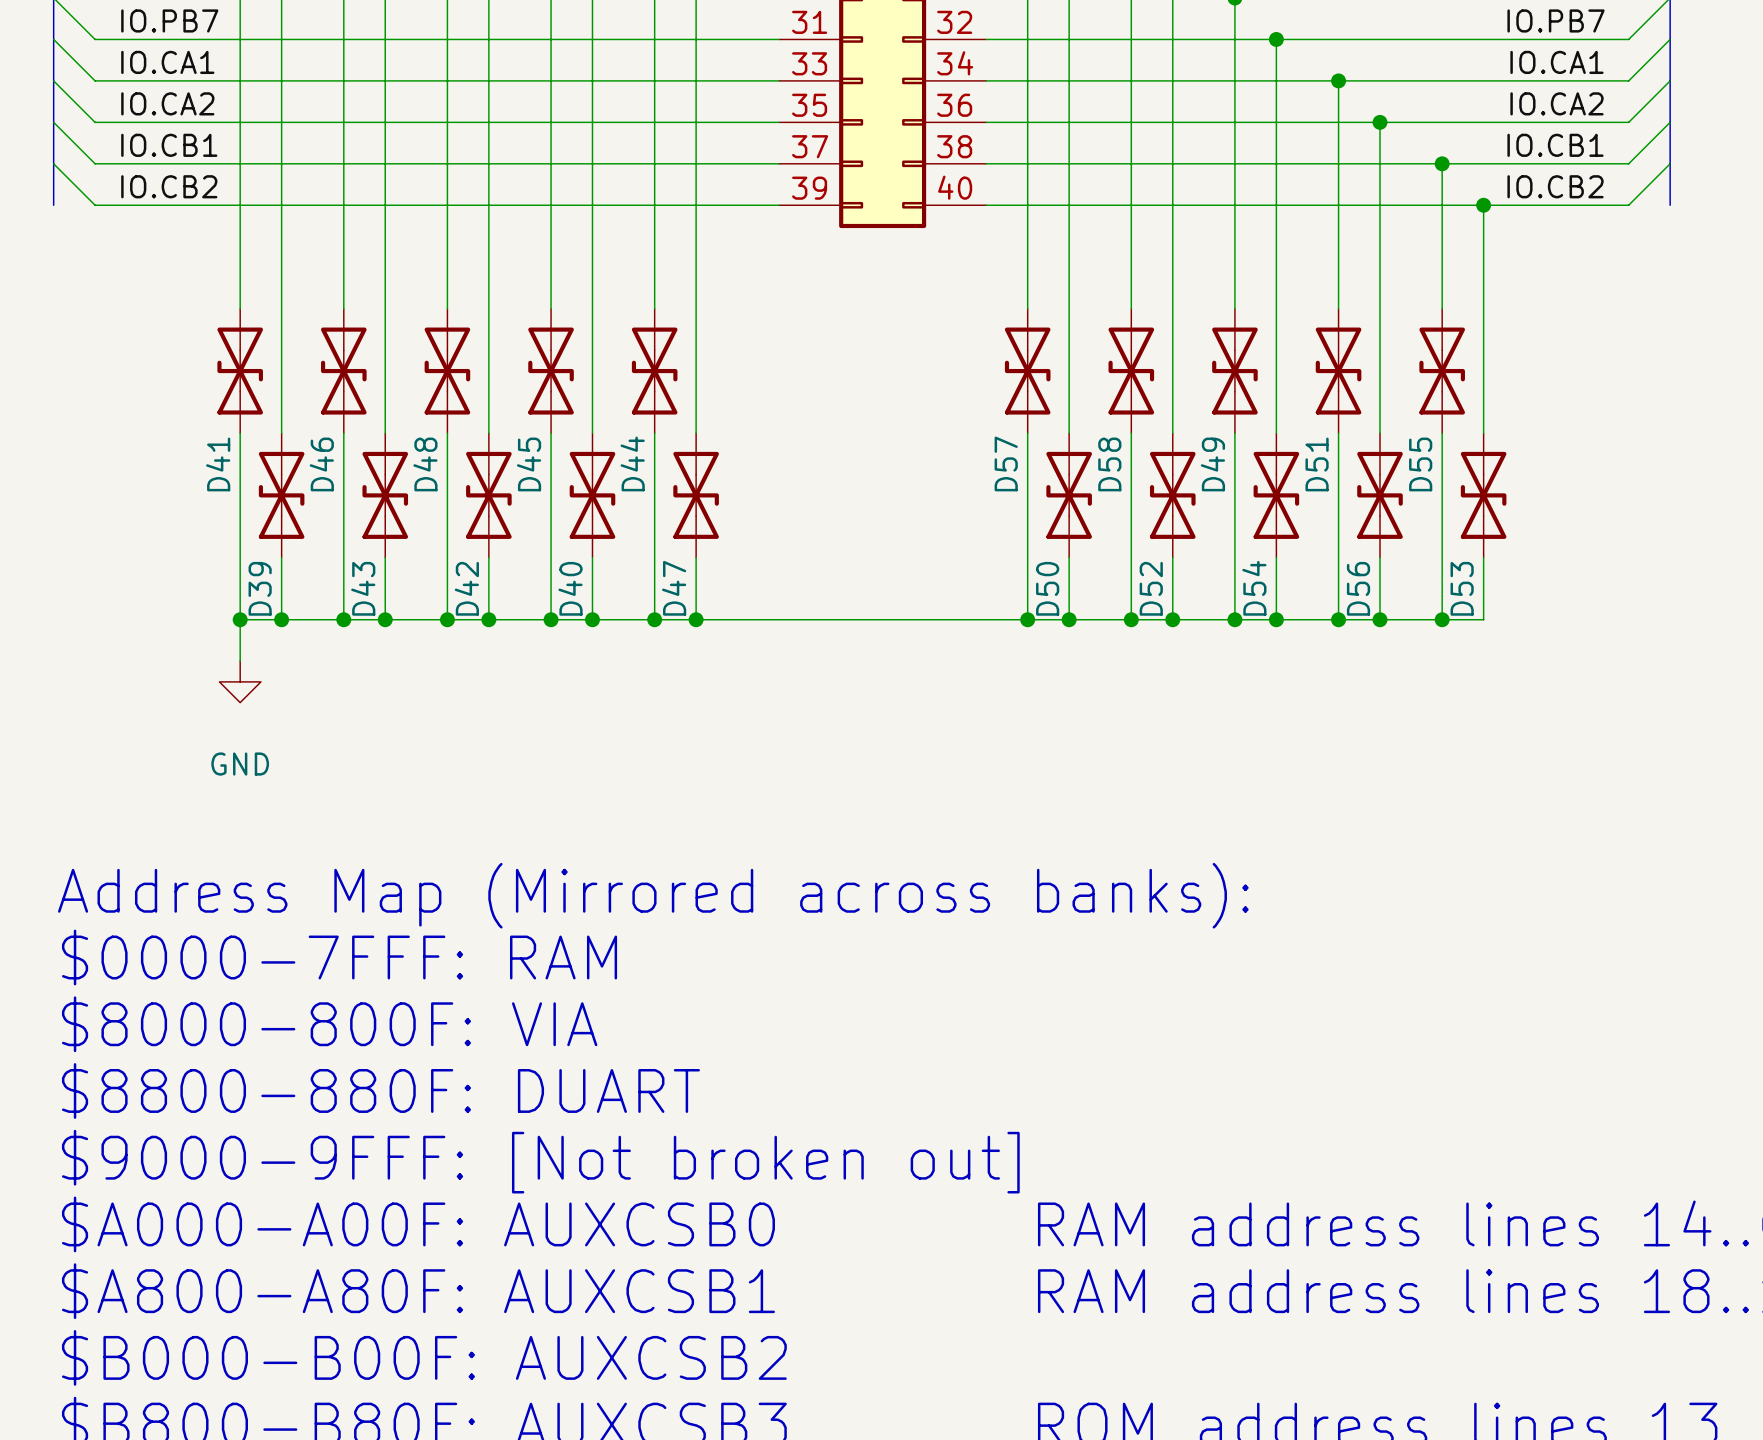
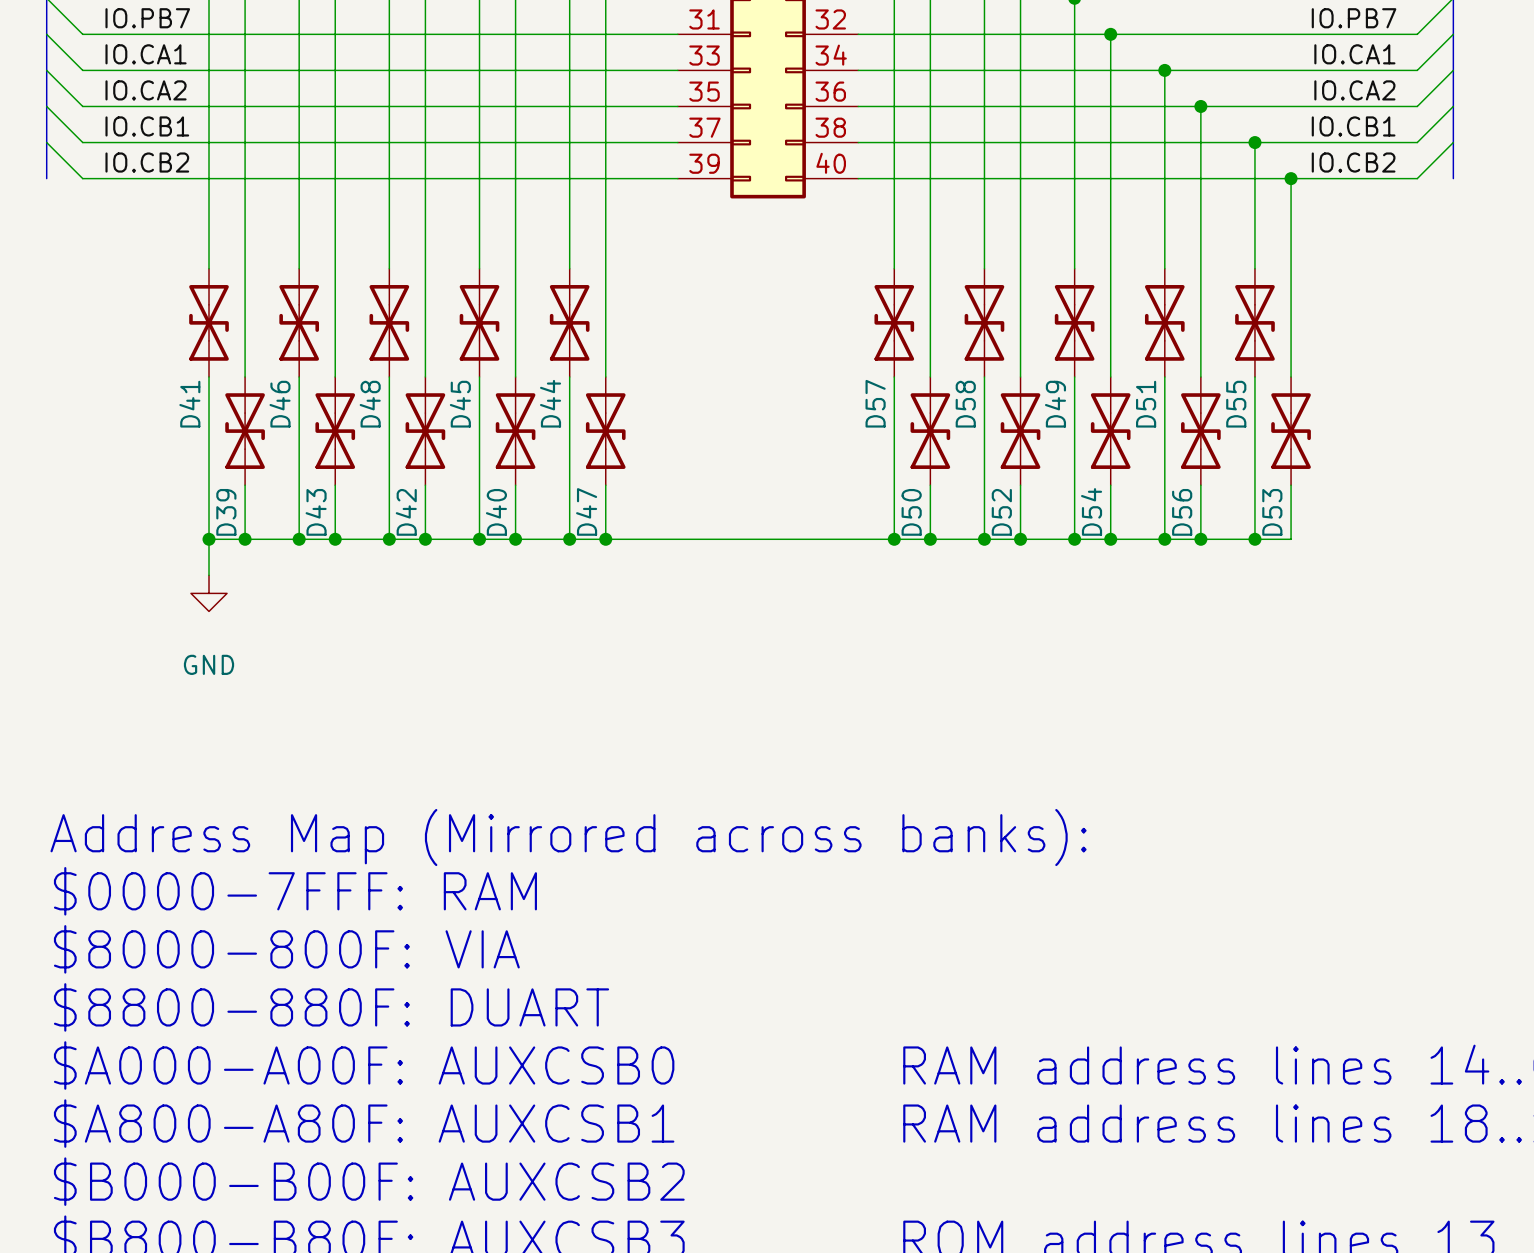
text: Address Map (Mirrored across banks): (653, 895) -> none
text: $0000-7FFF: RAM (339, 957) -> Address Map (Mirrored across banks): (568, 837)
text: $8000-800F: VIA (329, 1024) -> $0000-7FFF: RAM (295, 891)
text: $8800-880F: DUART (380, 1090) -> $8000-800F: VIA (286, 949)
text: $9000-9FFF: [Not broken out] (540, 1161) -> $8800-880F: DUART (331, 1007)

